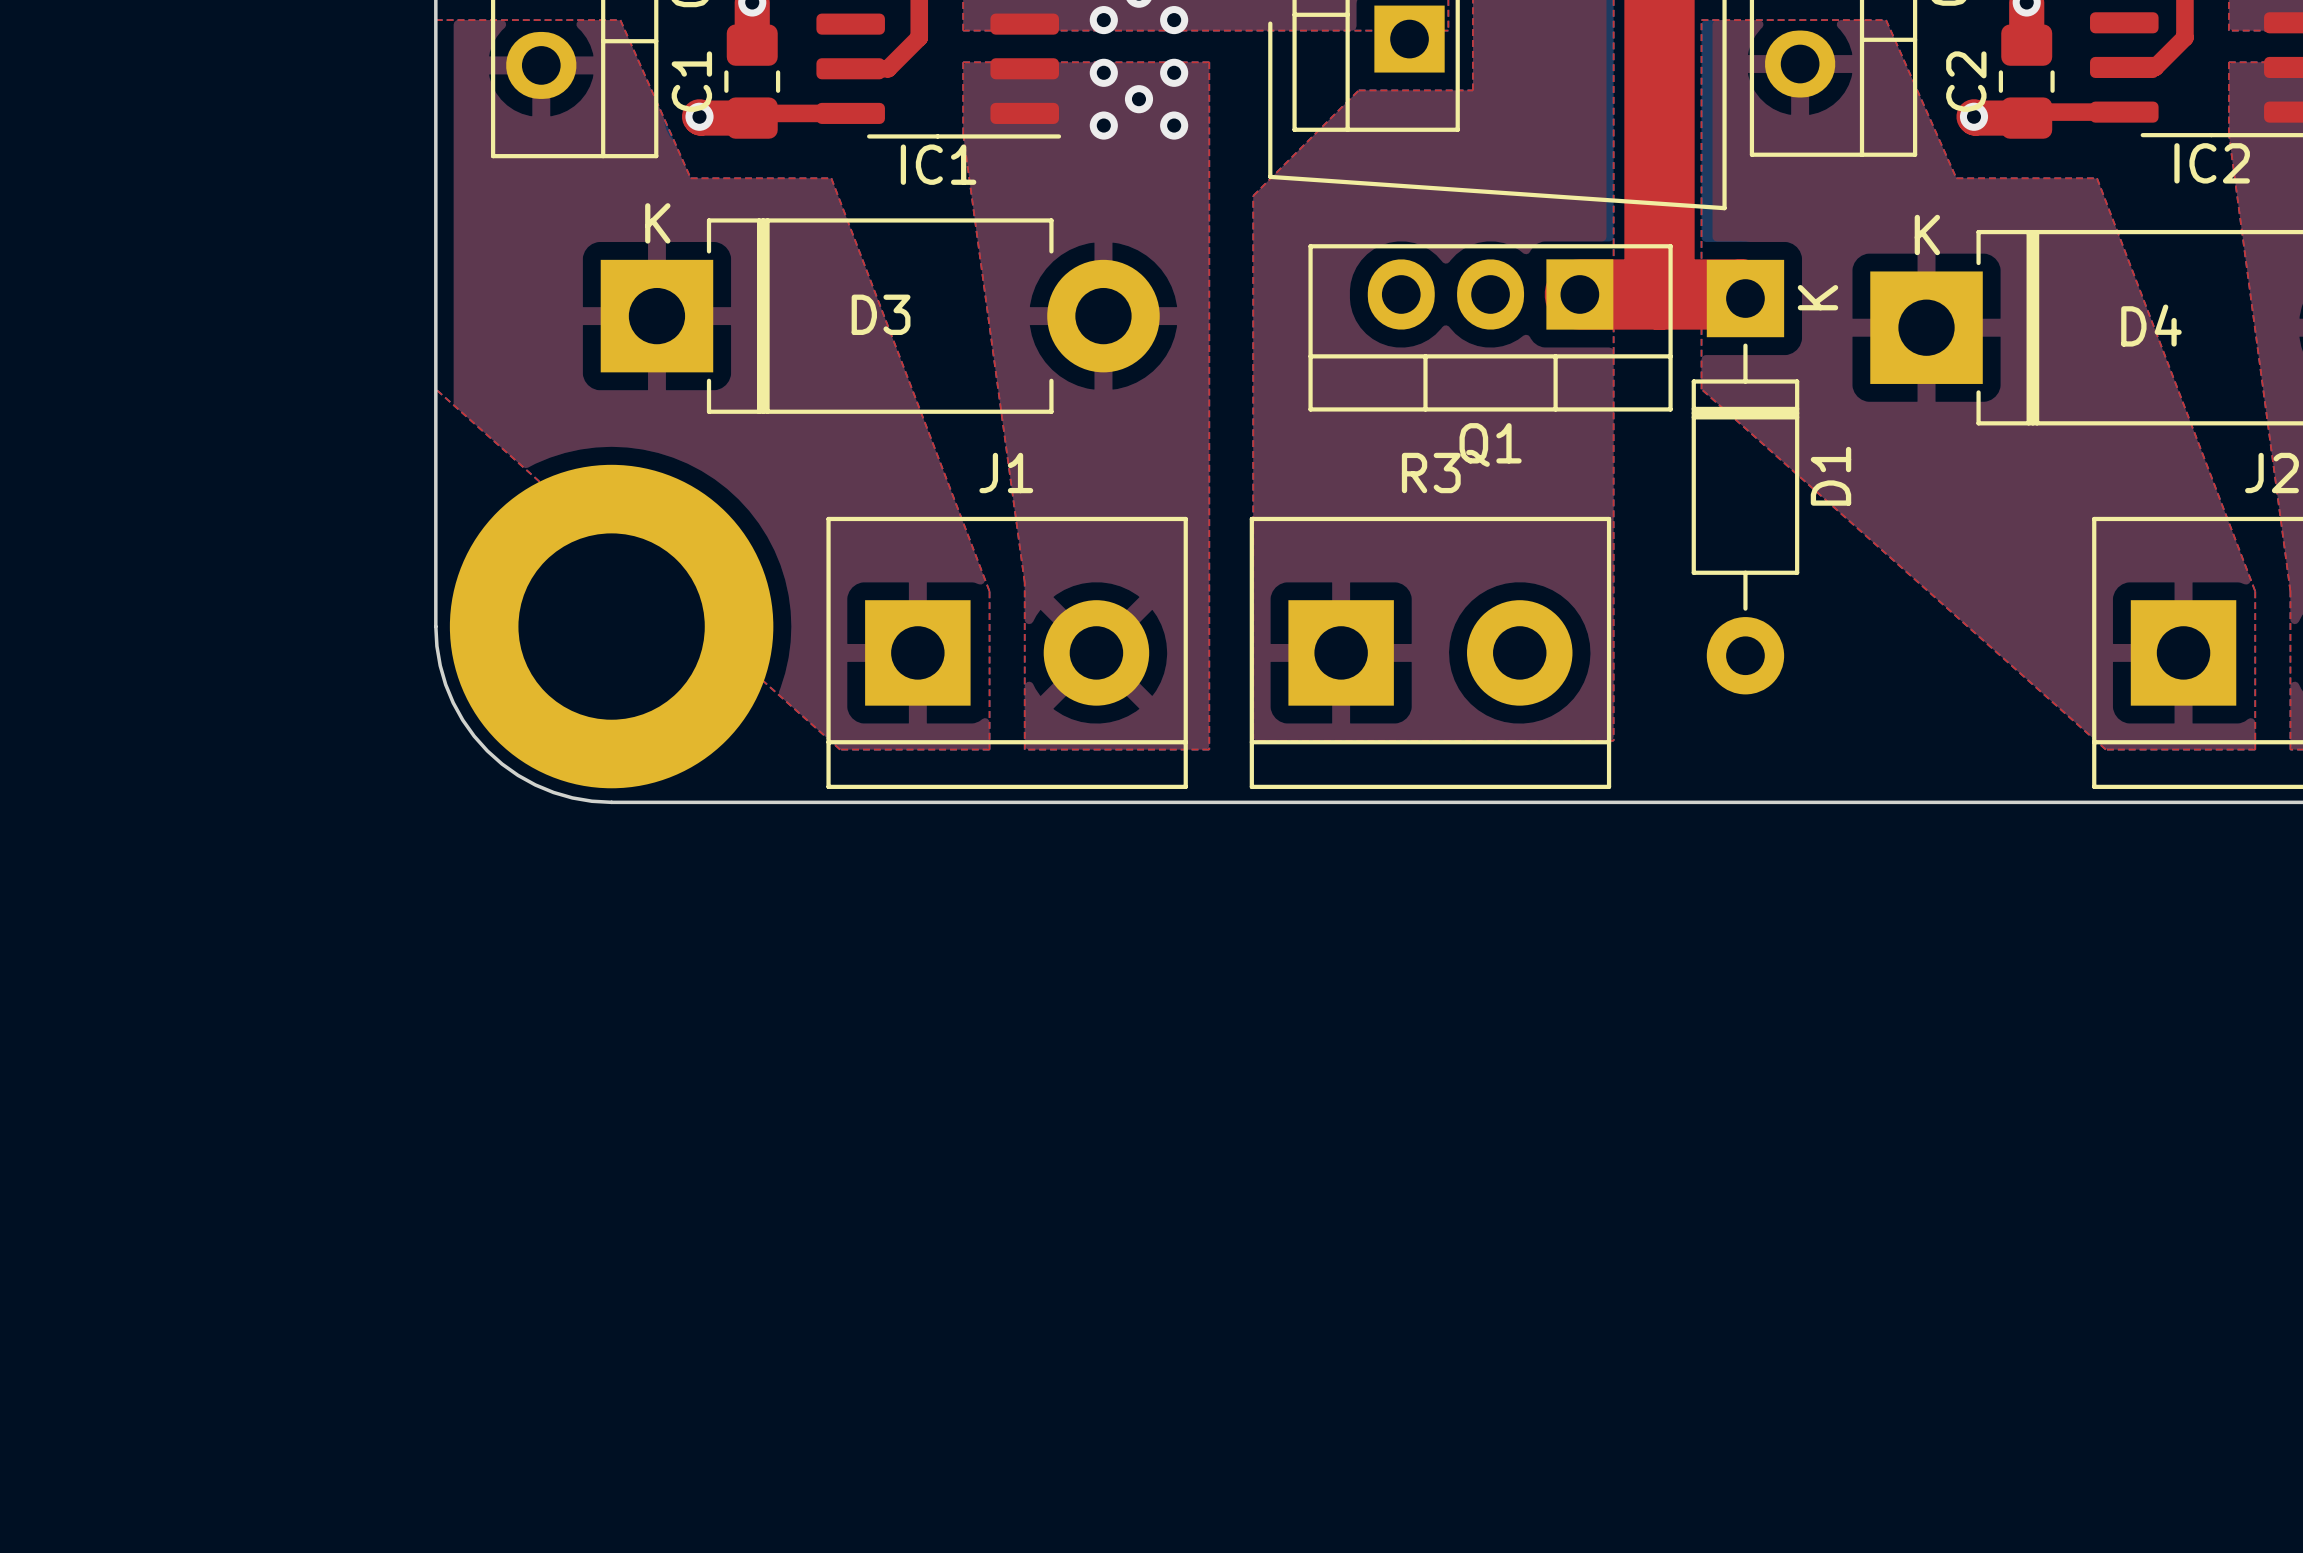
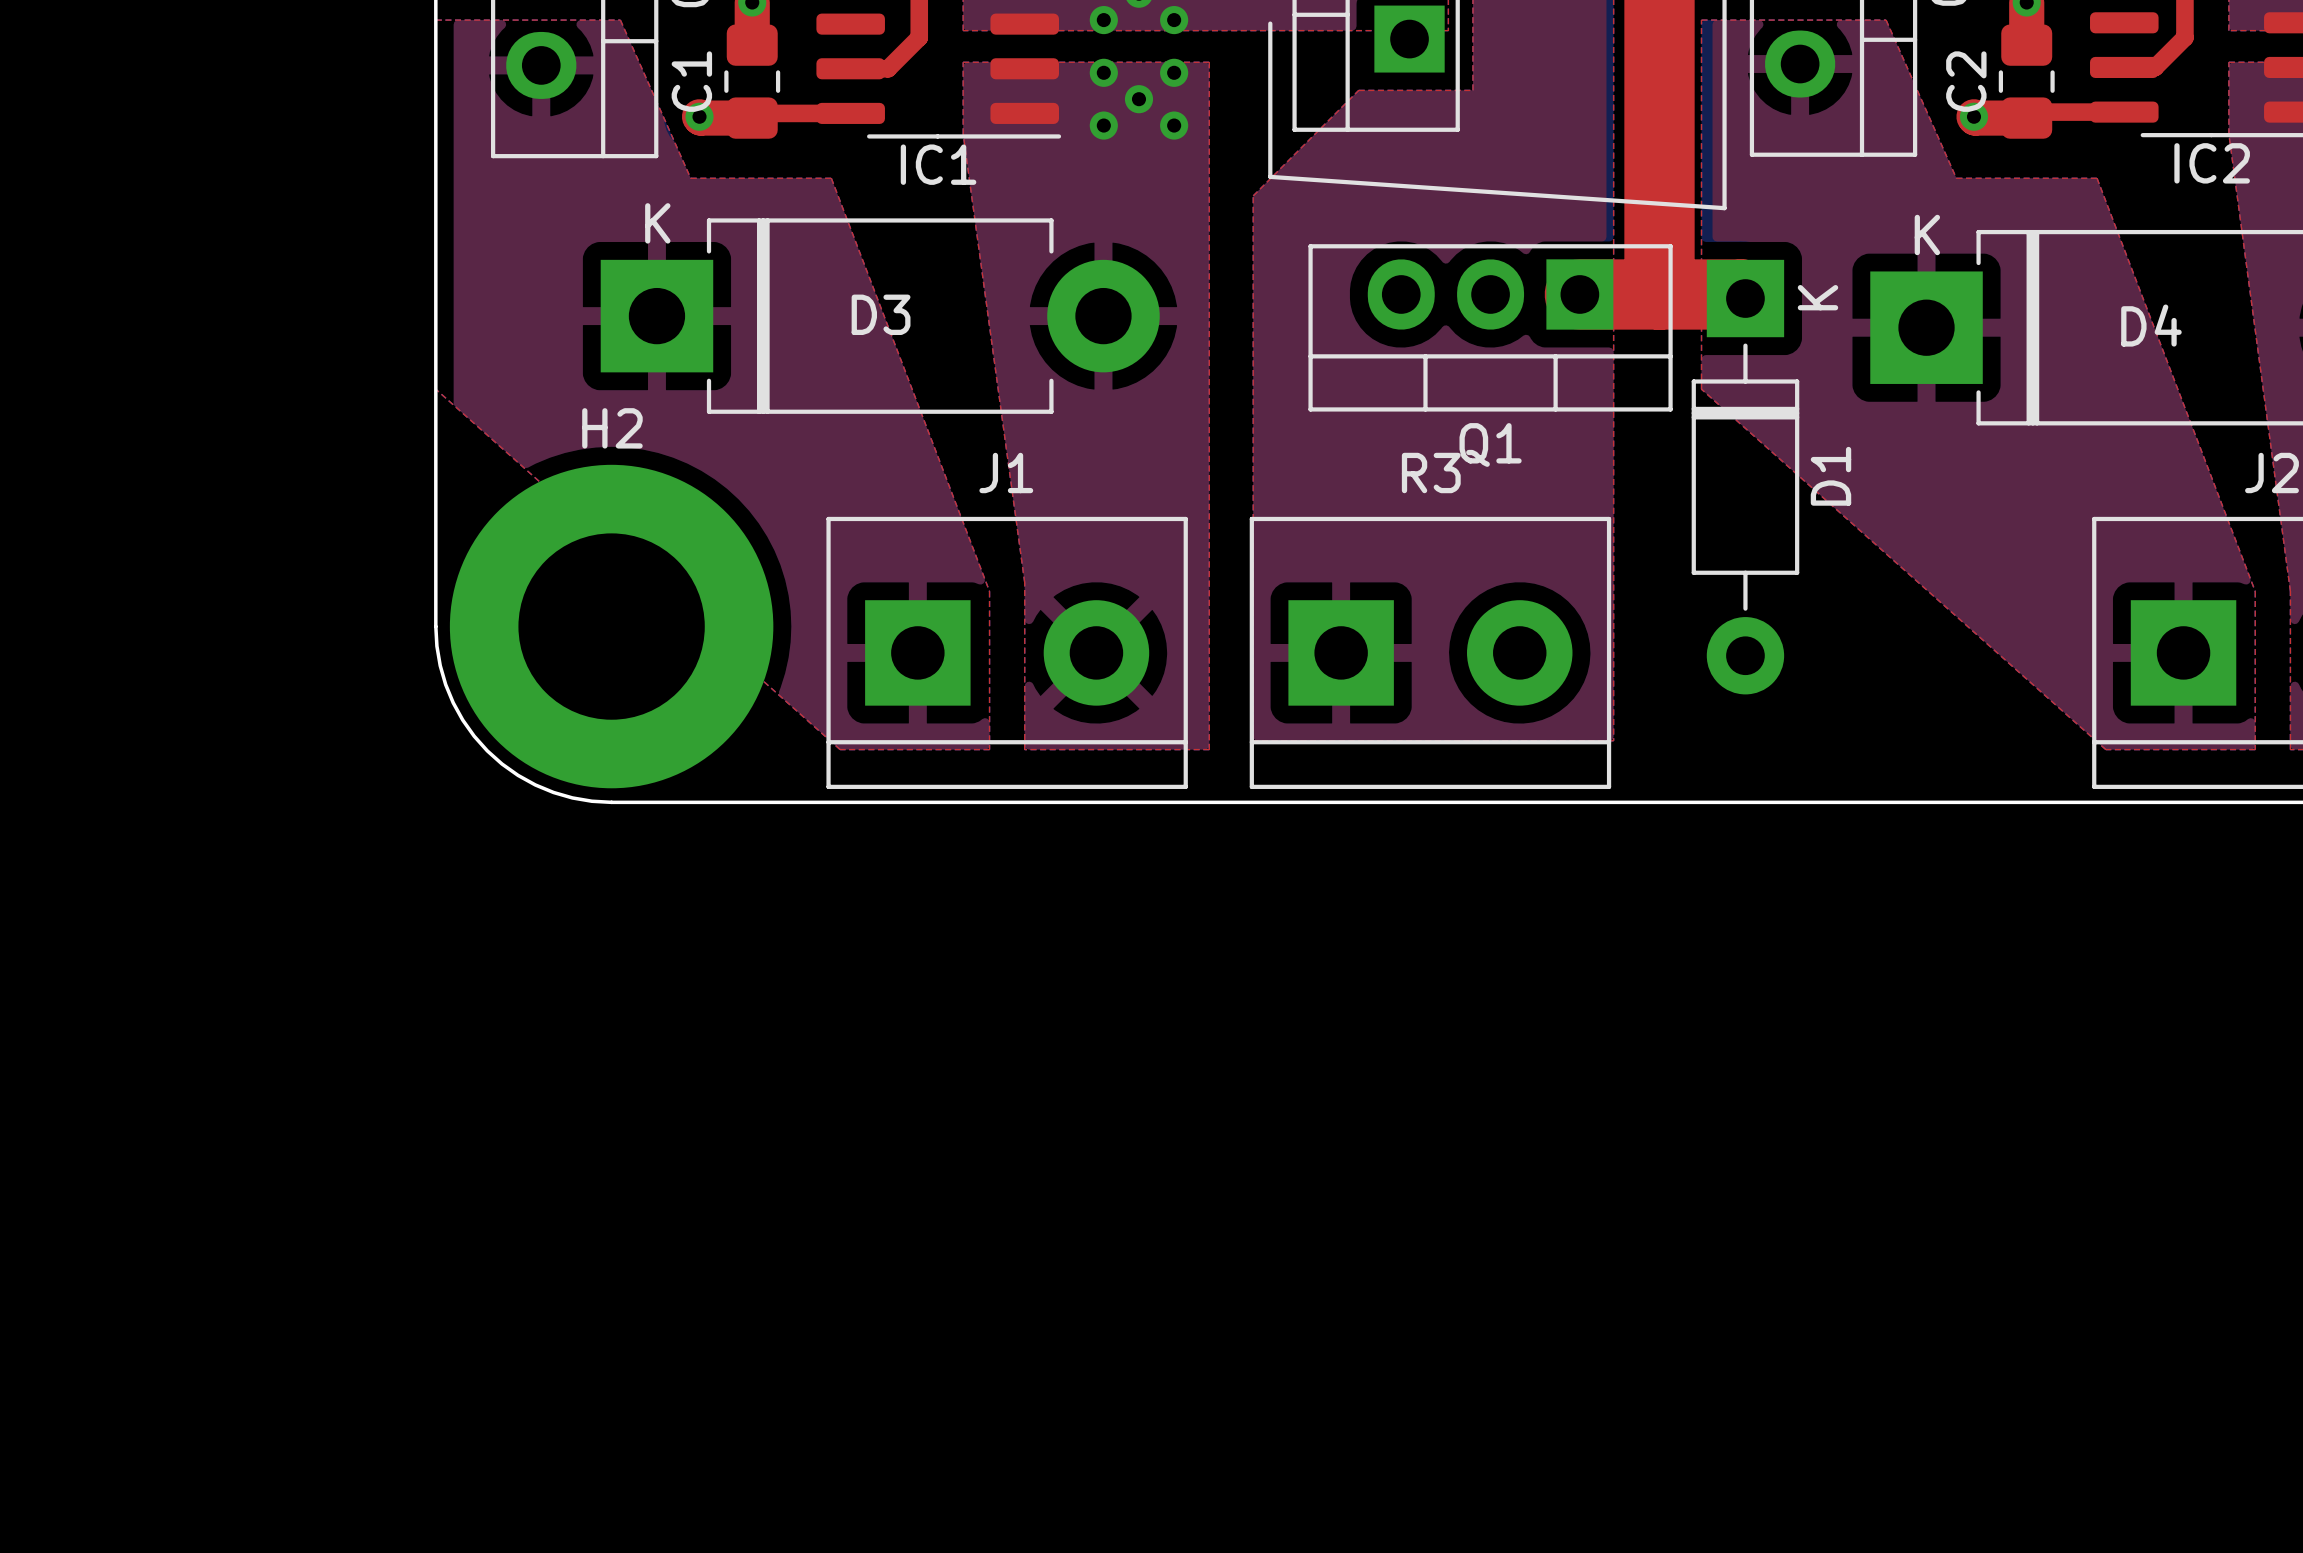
H2 name: none -> H2 (612, 428)

